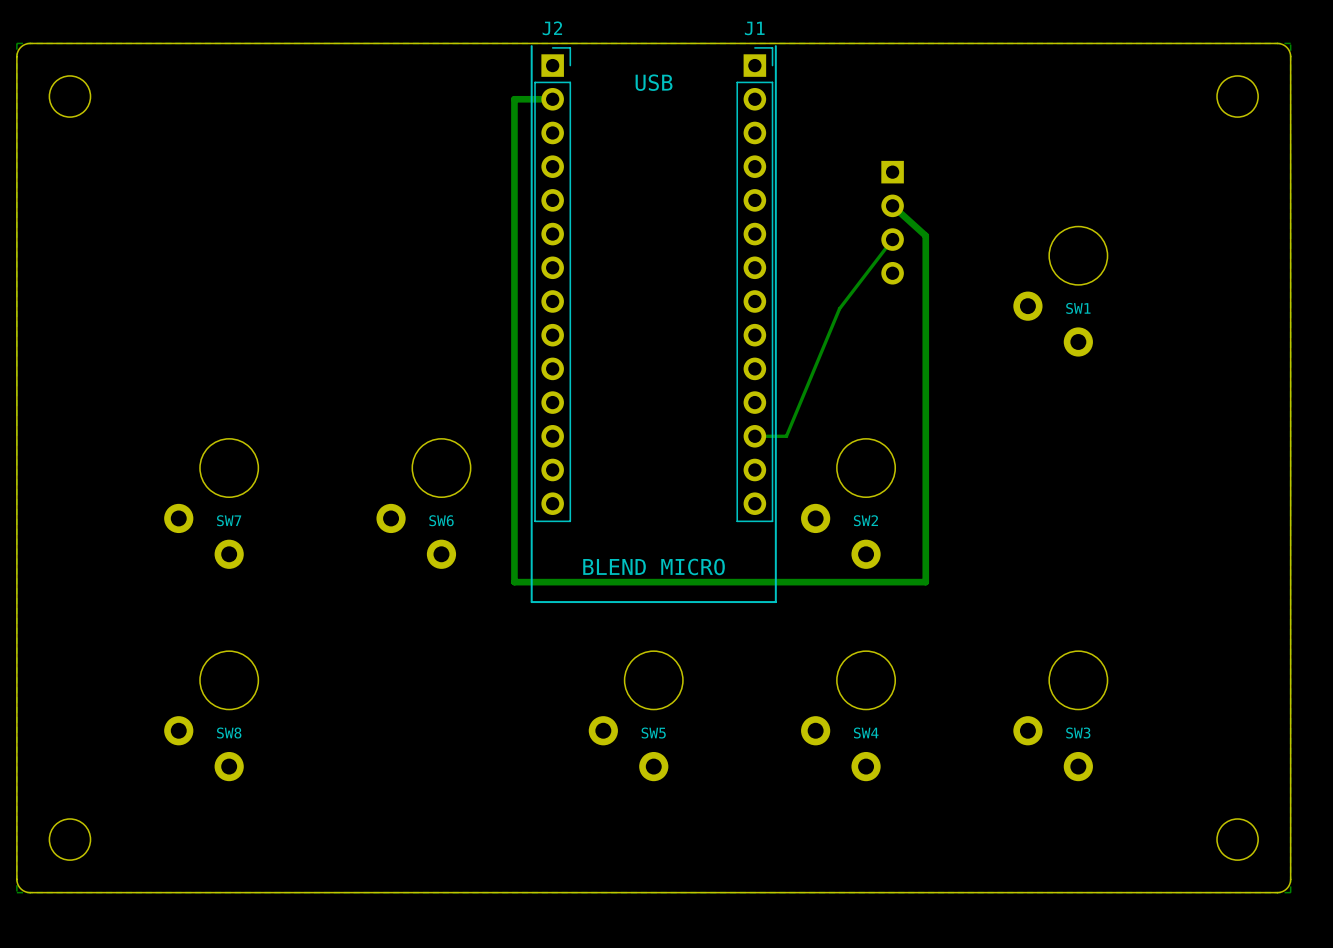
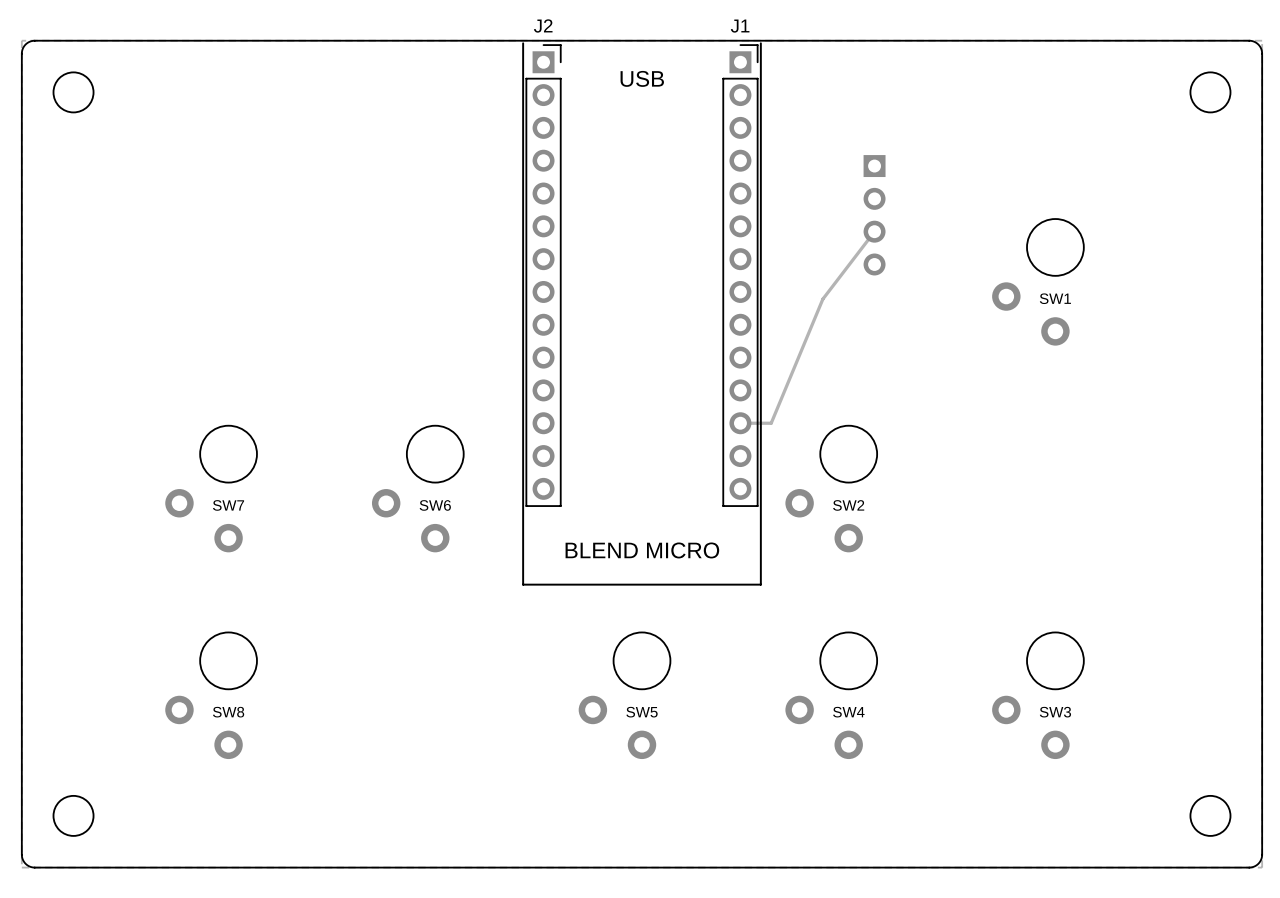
track: (552, 99) (514, 99) (514, 582) (925, 582) (925, 235) (892, 205) -> none

